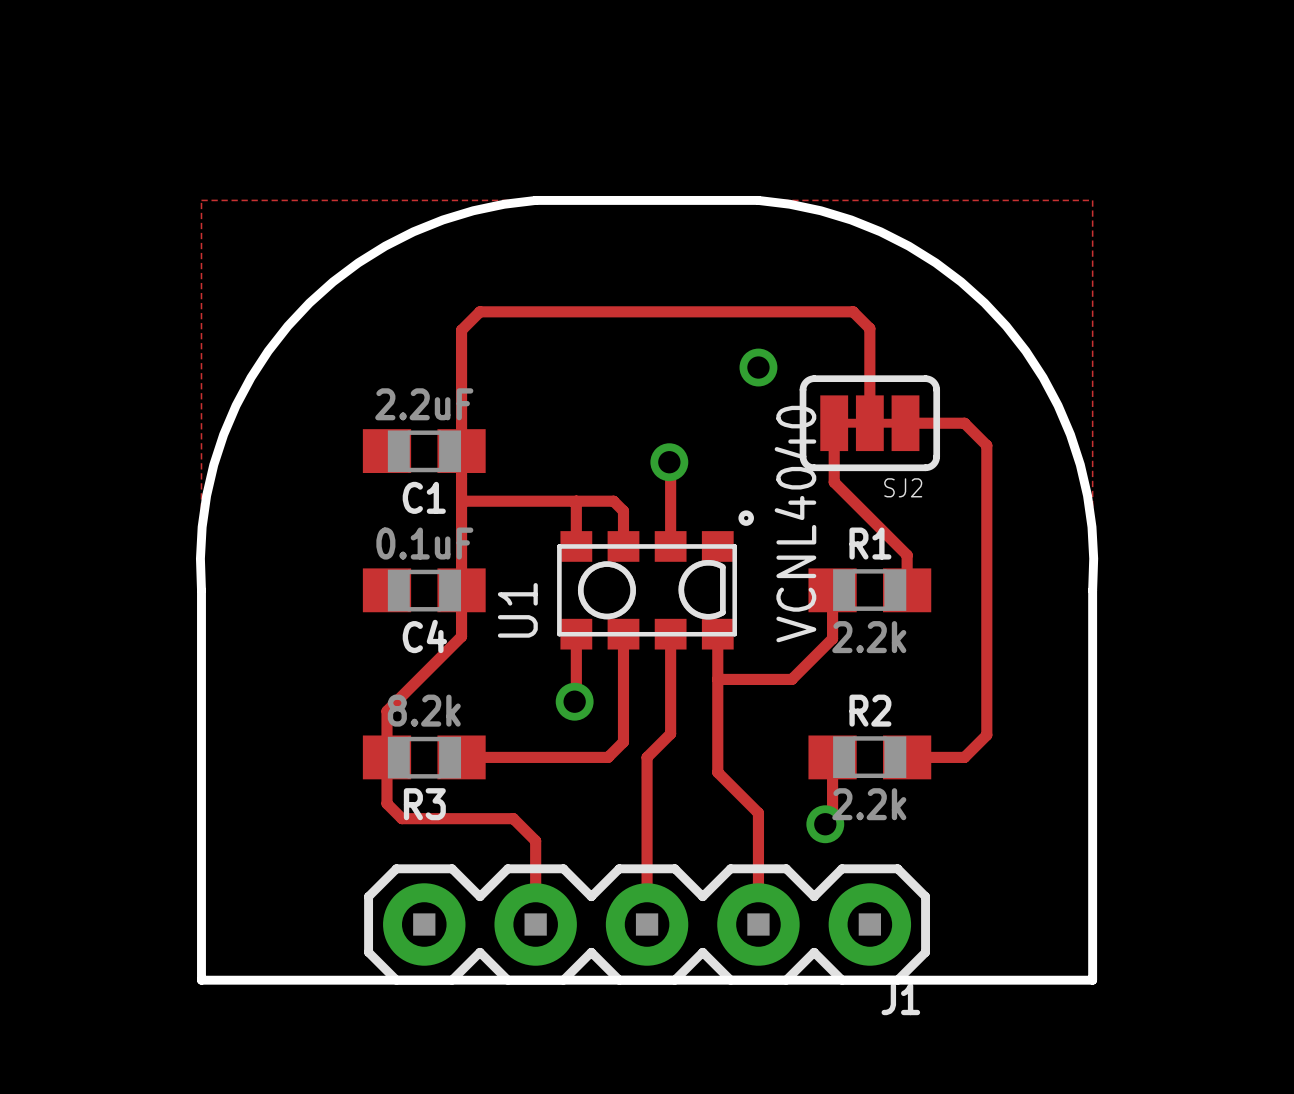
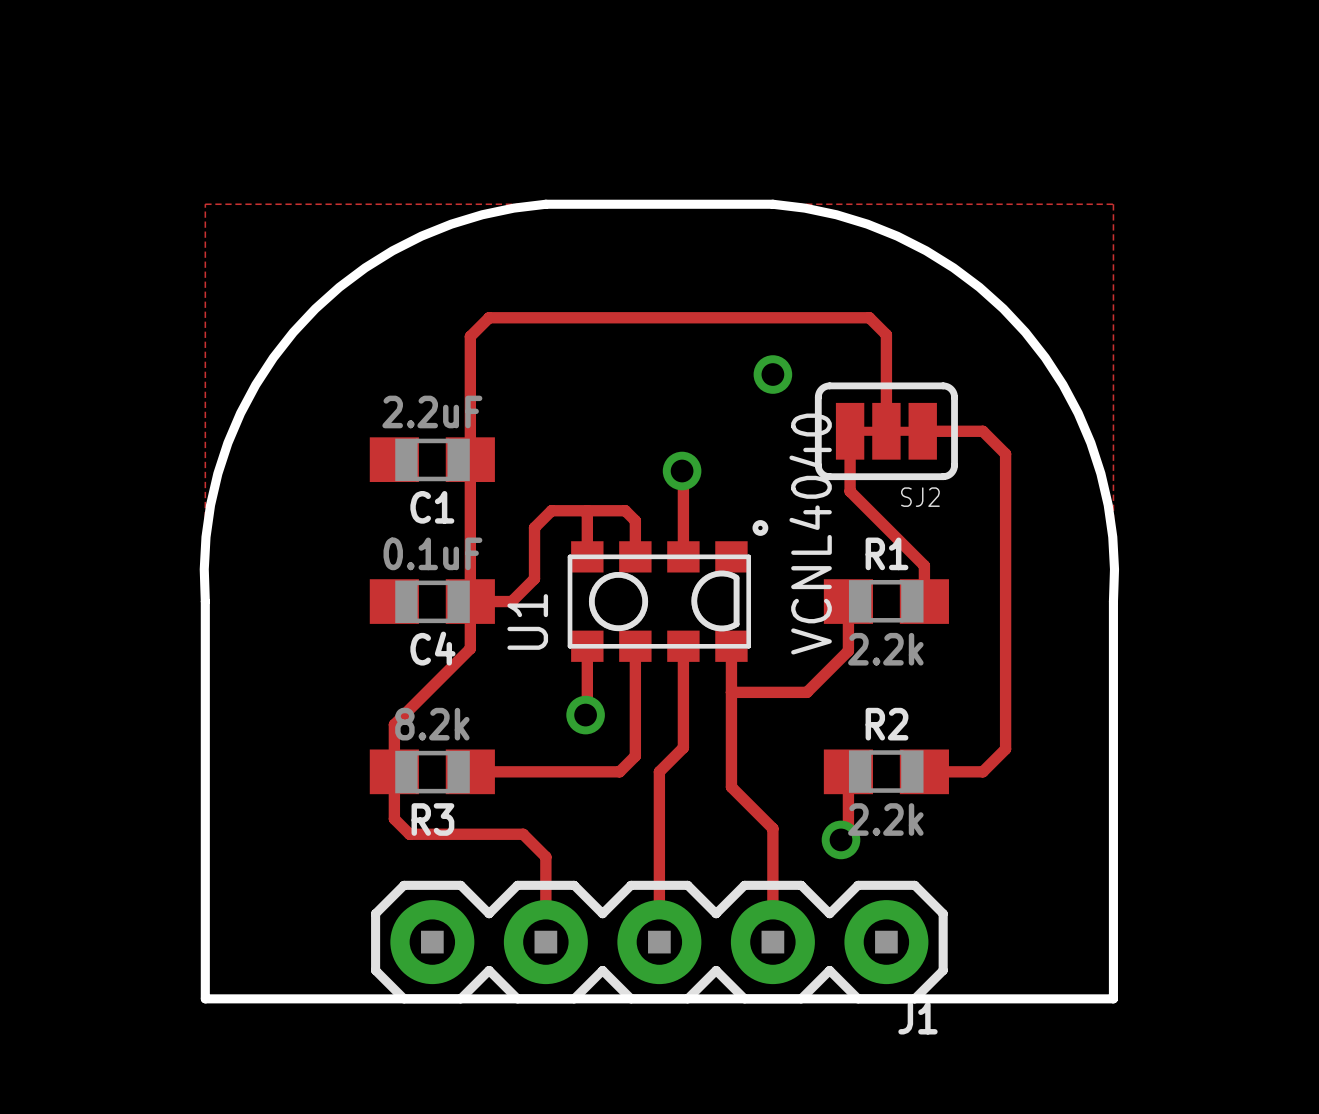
track: (461, 501) (541, 501) -> (470, 601) (511, 601) (534, 578) (534, 527) (551, 510)

